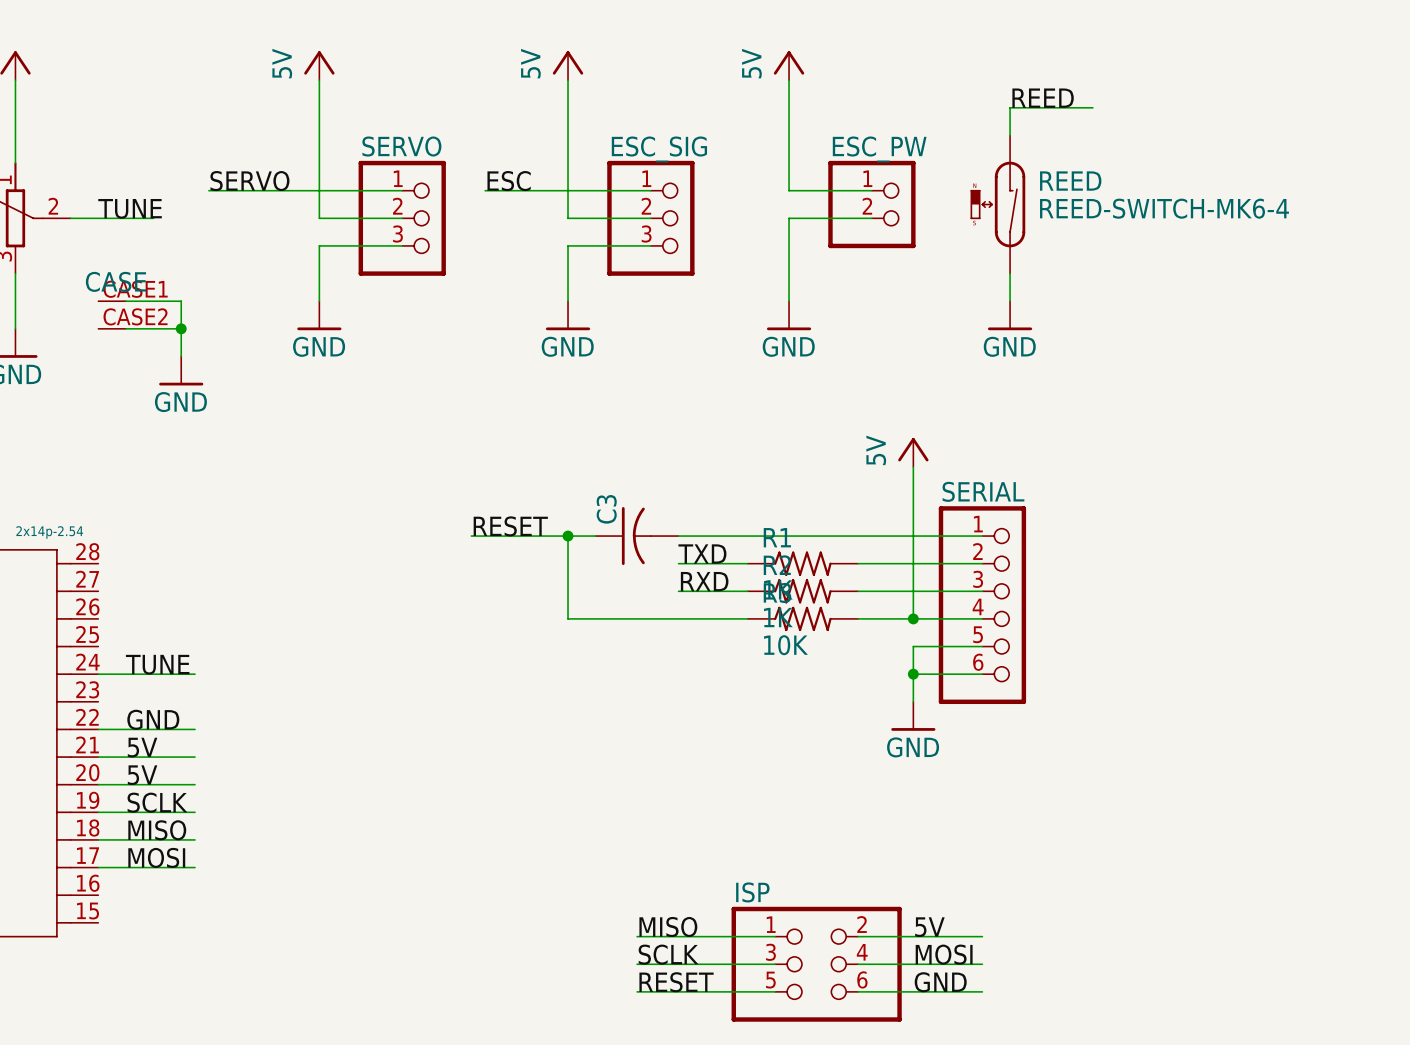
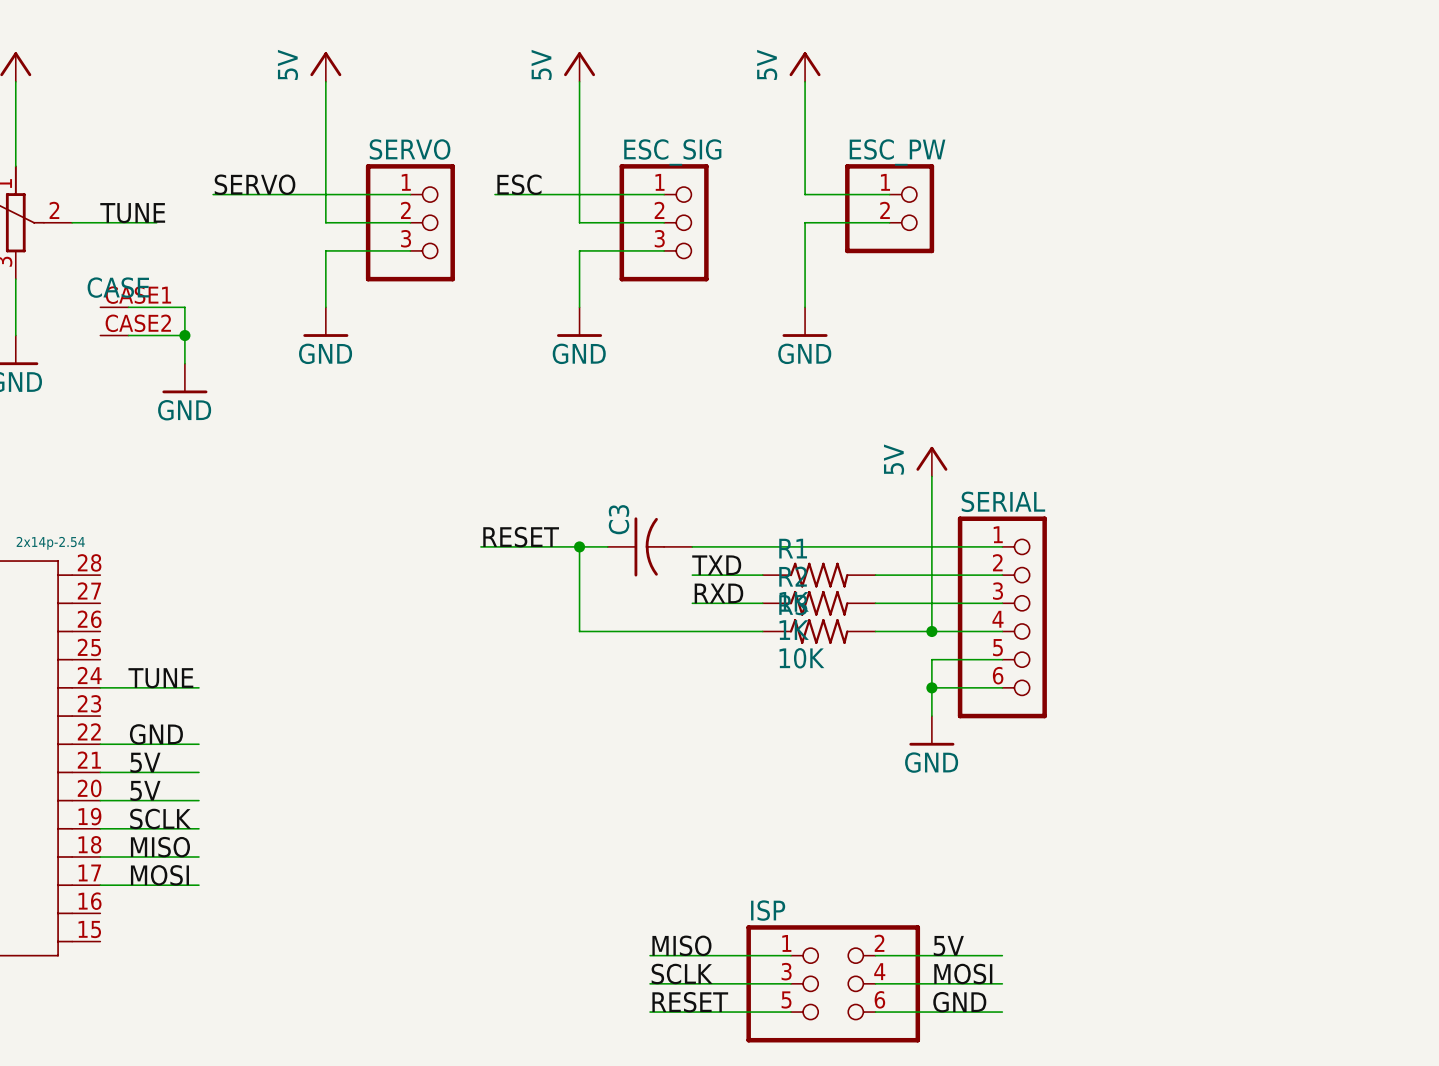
label: REED (1043, 98) -> none
wire: (1092, 107) (1010, 107) (1010, 135) -> none
REED: REED-SWITCH-MK6-4 (997, 204) -> none
wire: (1010, 273) (1010, 301) -> none
power symbol: GND (1010, 315) -> none

